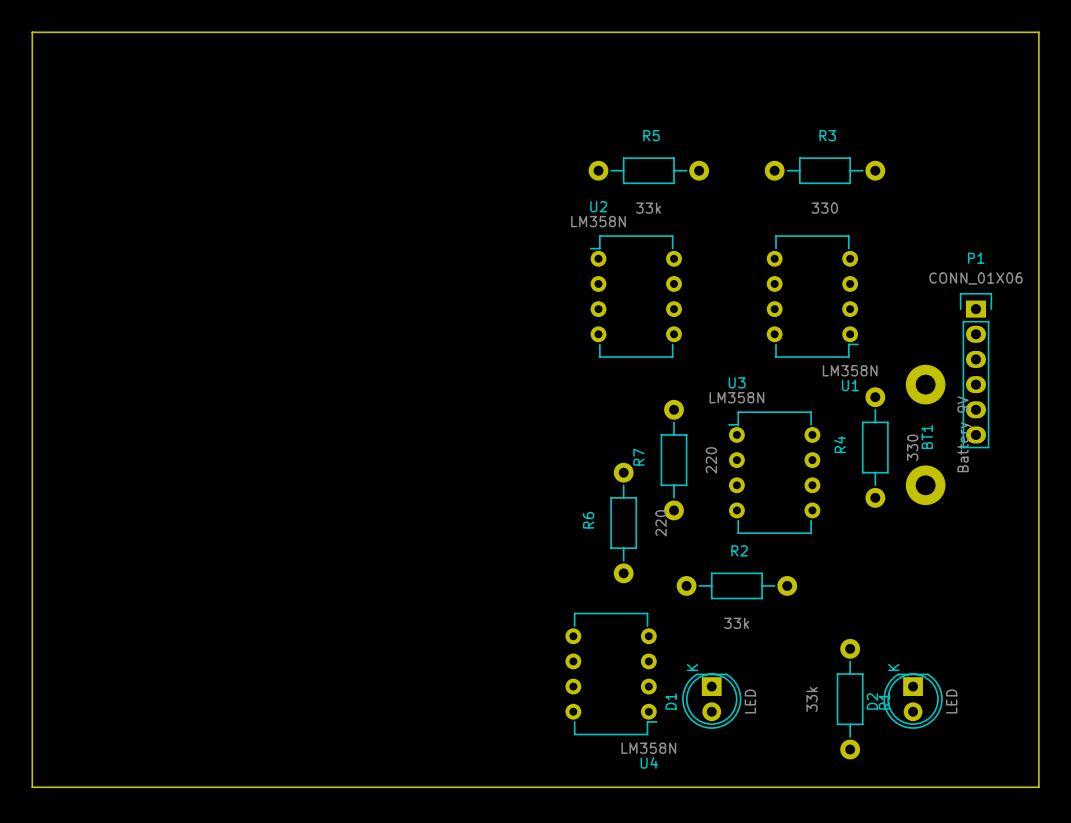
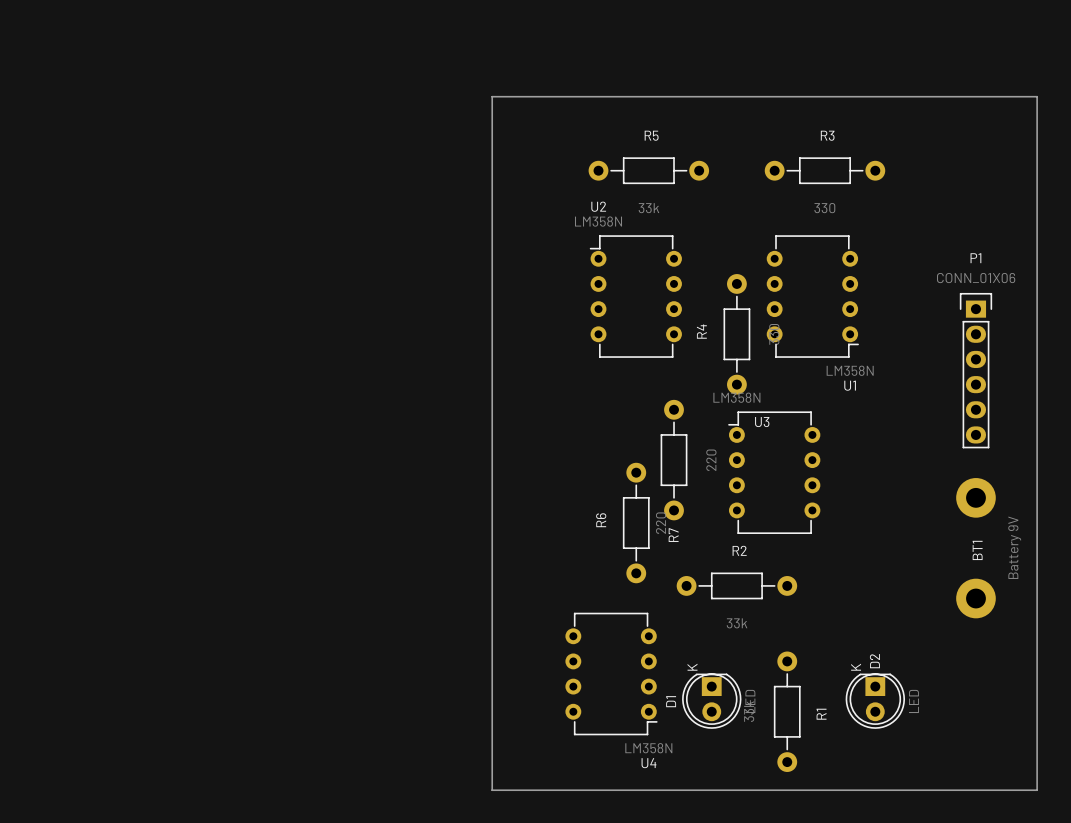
board edge: (32, 32) (32, 787) (1038, 787) (1038, 32) (32, 32) -> none
board edge: none -> (492, 96) (492, 790) (1037, 790) (1037, 96) (492, 96)
U3 name position: U3 (737, 382) -> U3 (762, 422)
BT1 position: (925, 434) -> (975, 548)
R4 position: (875, 447) -> (736, 334)
R7 name position: R7 (638, 457) -> R7 (673, 535)
R6 position: (623, 523) -> (636, 523)
R1 position: (850, 699) -> (787, 711)
D2 name position: D2 (872, 701) -> D2 (874, 661)
D2 position: (913, 701) -> (875, 701)

